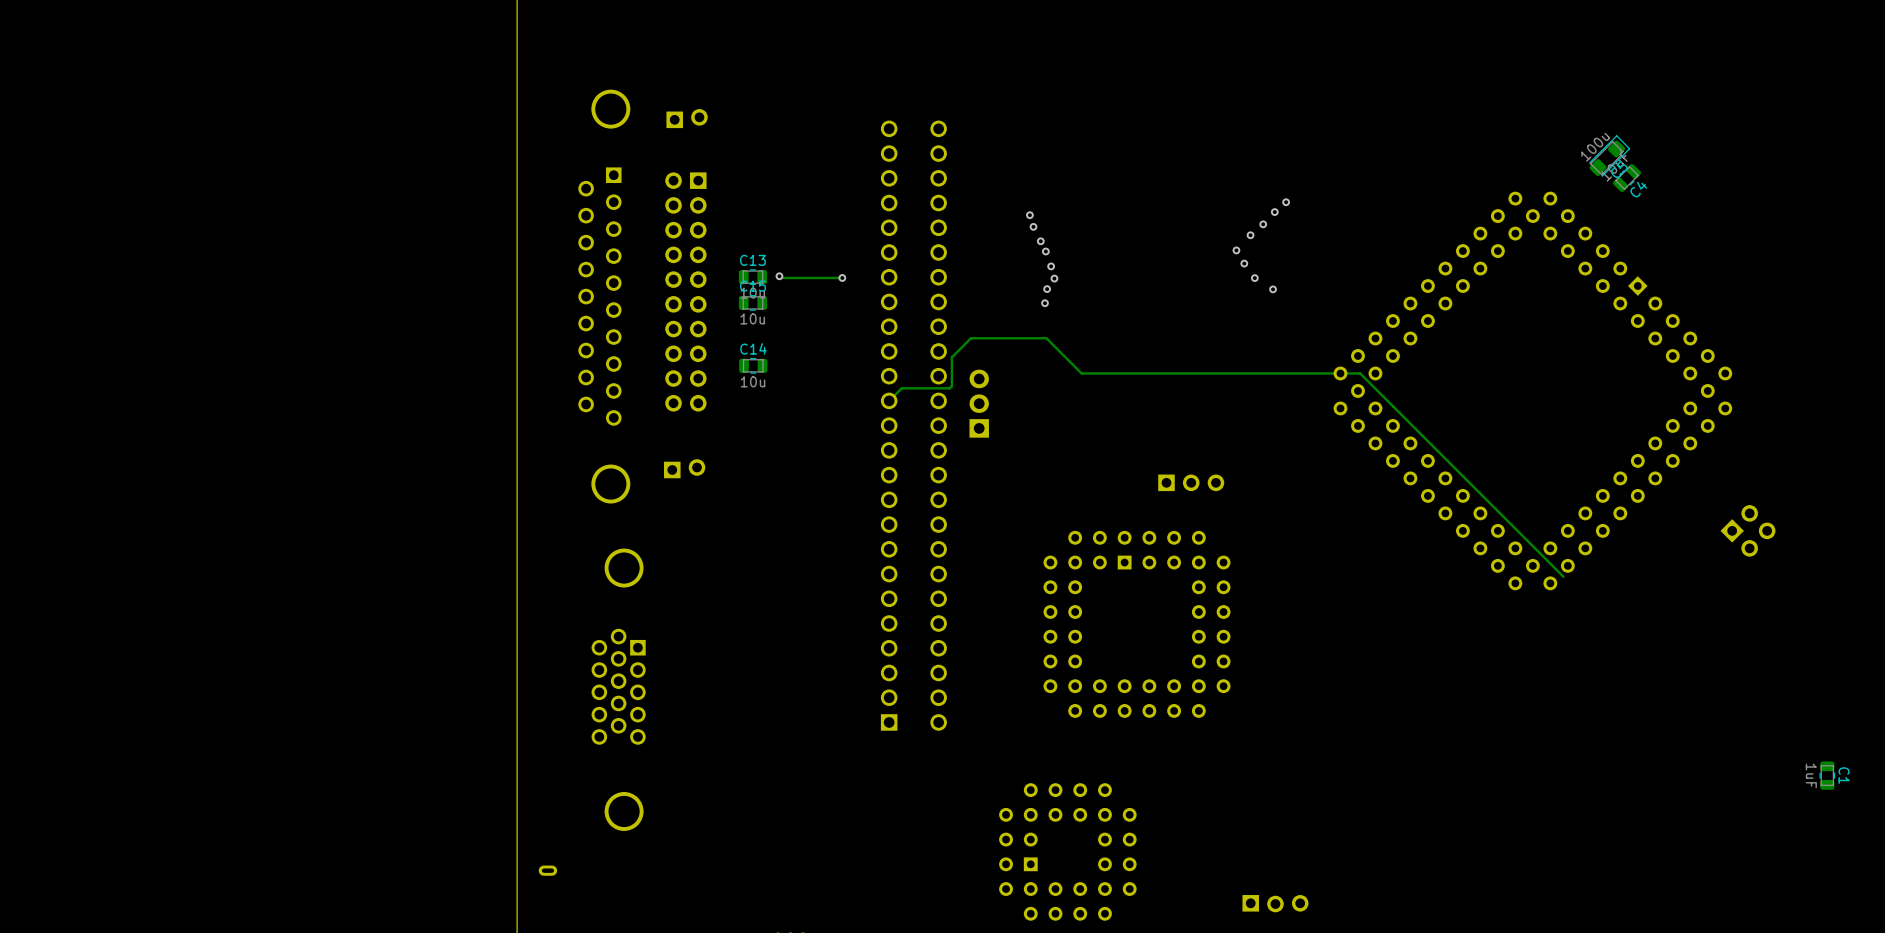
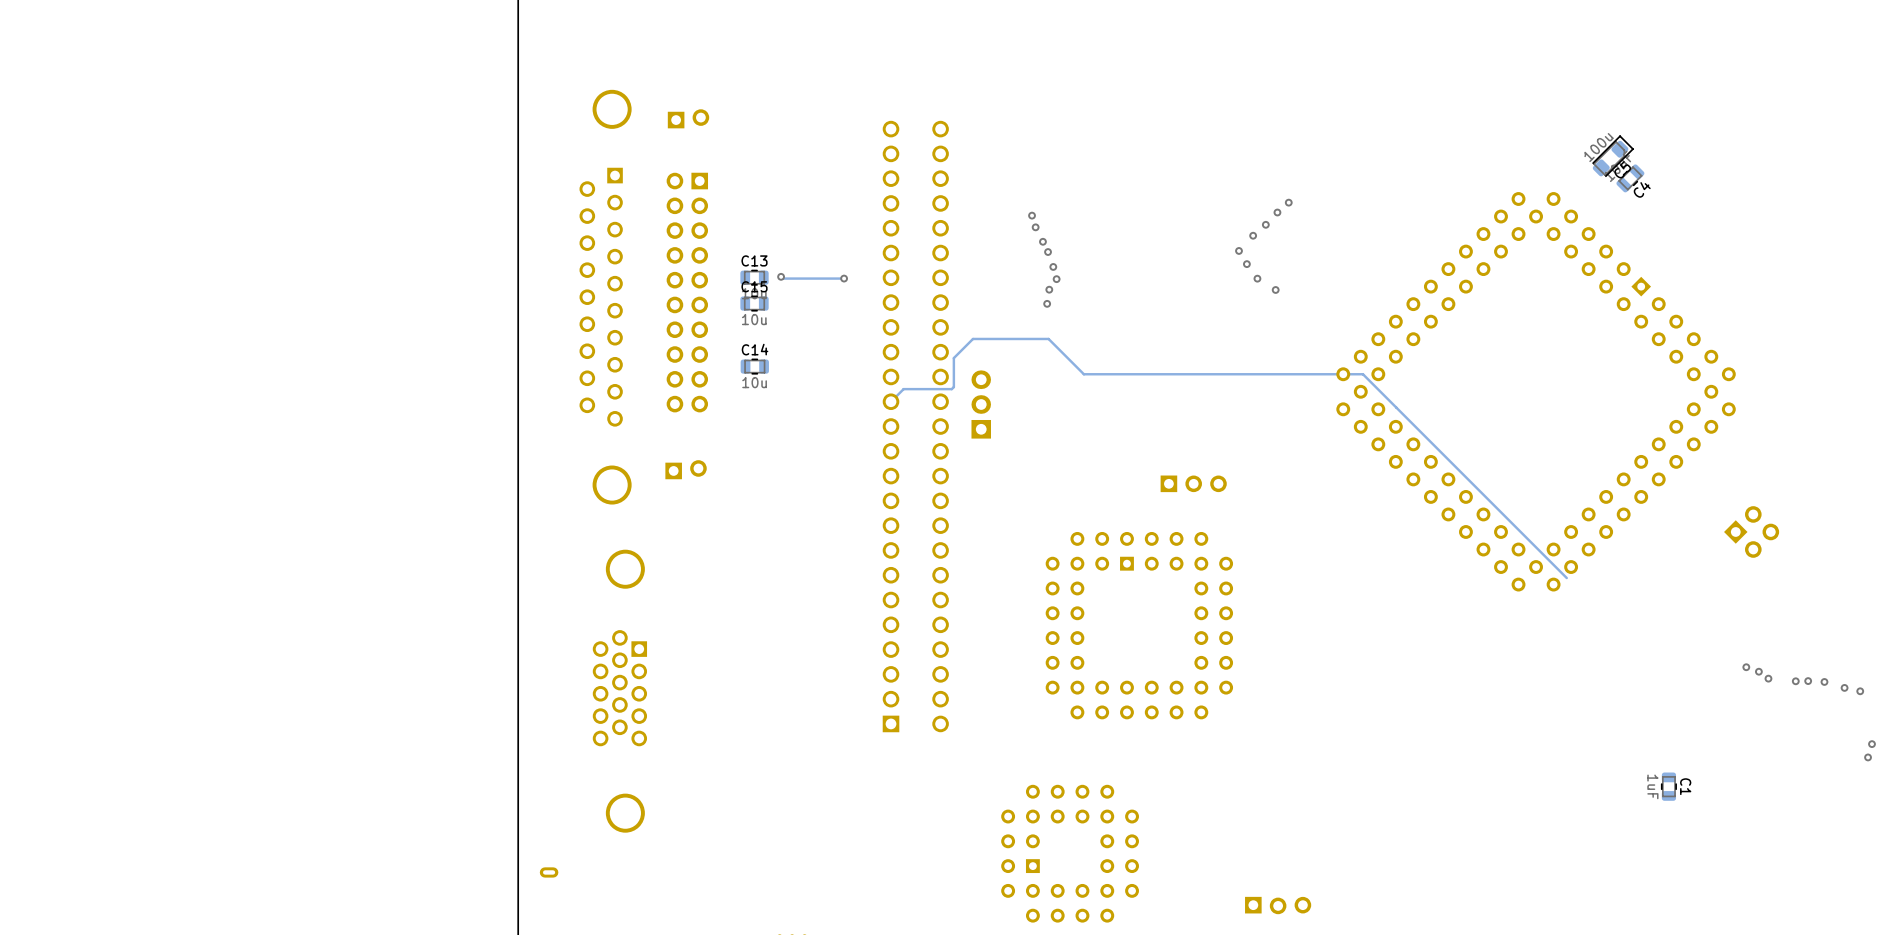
via: none -> (1746, 667)
via: none -> (1758, 671)
via: none -> (1768, 678)
via: none -> (1795, 681)
via: none -> (1808, 681)
via: none -> (1824, 681)
via: none -> (1844, 687)
via: none -> (1860, 691)
via: none -> (1871, 744)
via: none -> (1868, 757)
C1 position: (1827, 775) -> (1668, 786)

